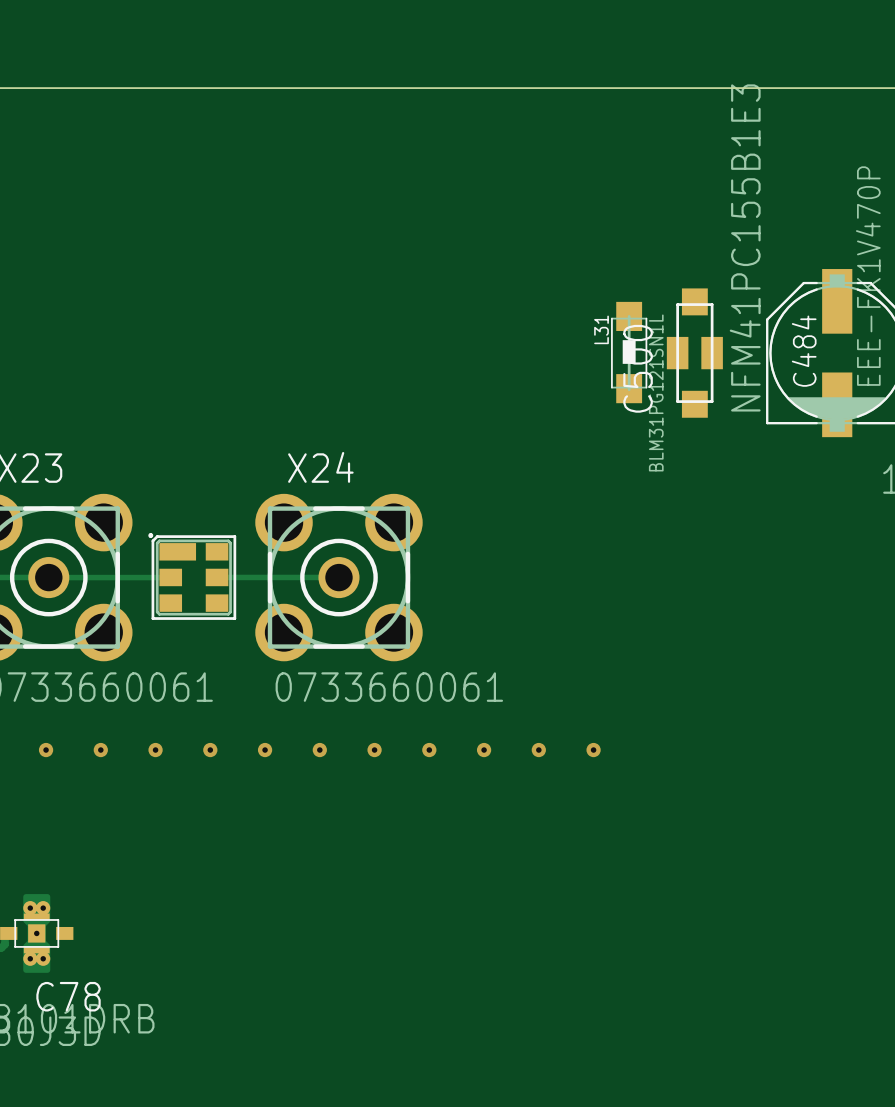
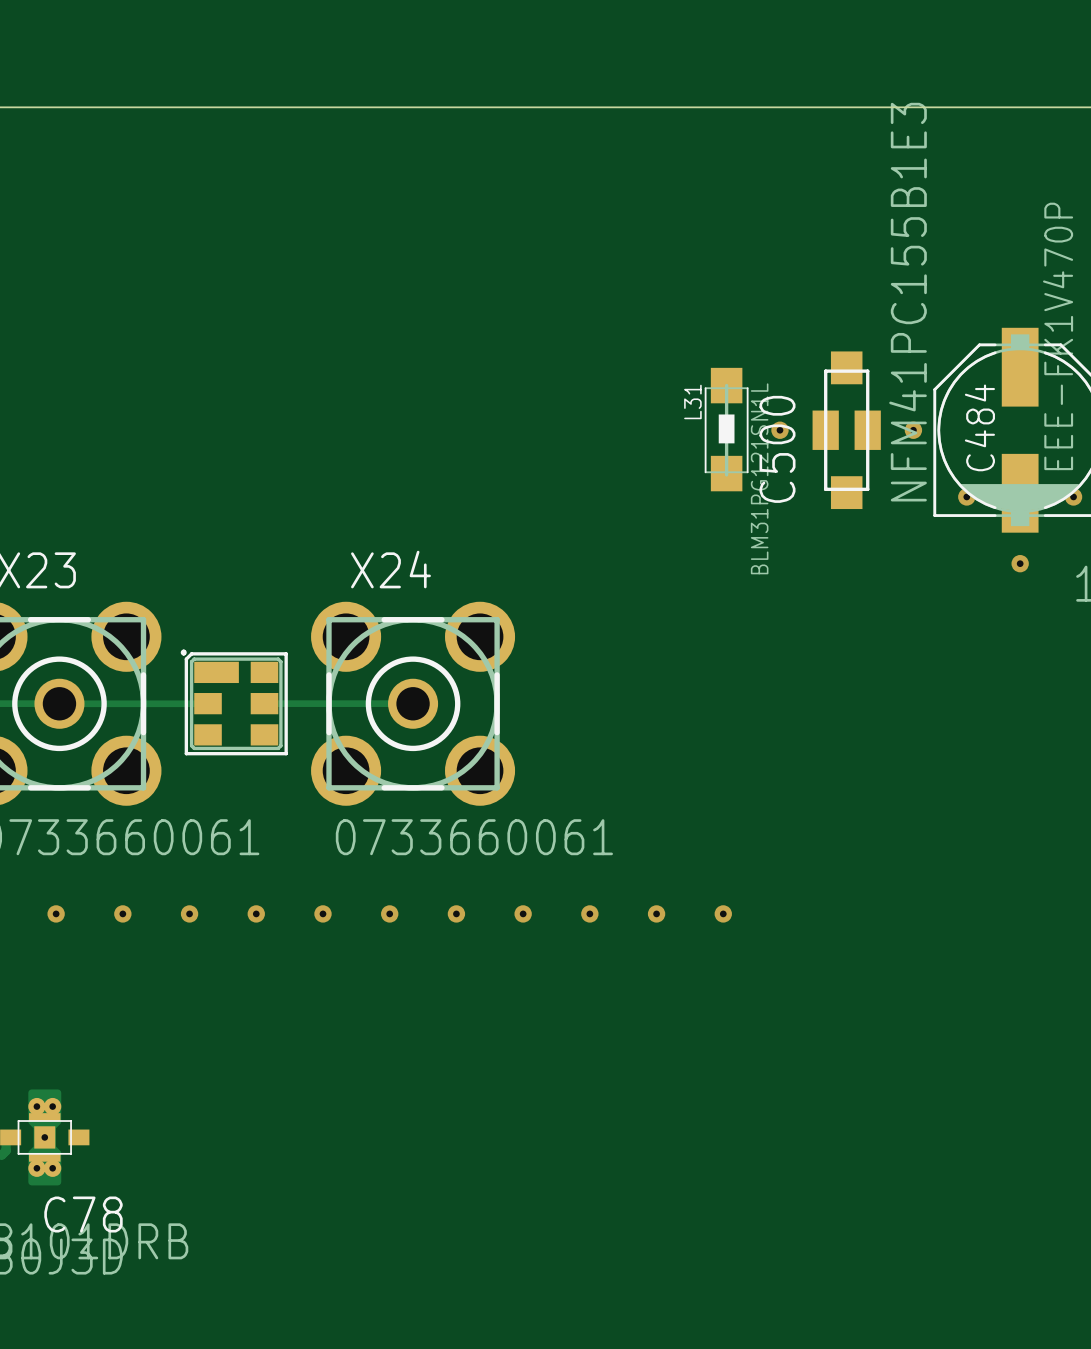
L31 position: (629, 352) -> (726, 429)
via: none -> (779, 430)
via: none -> (913, 430)
via: none -> (966, 496)
via: none -> (1073, 496)
via: none -> (1020, 563)

